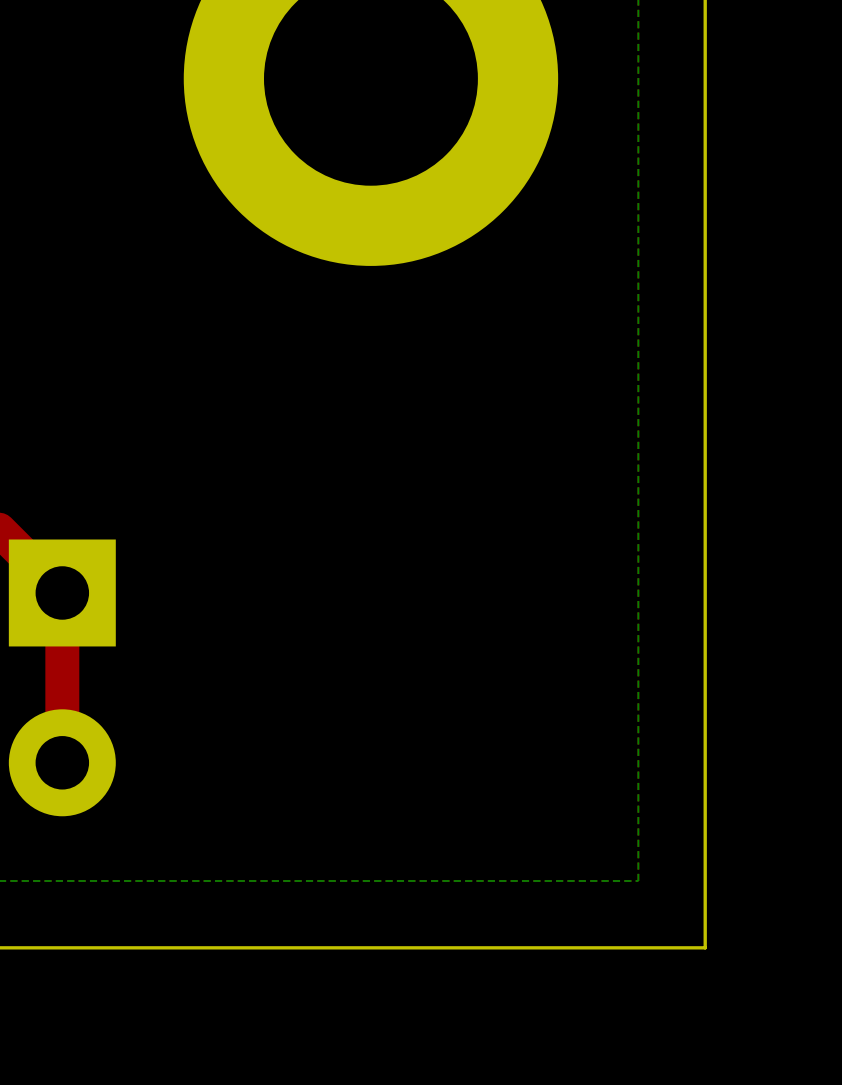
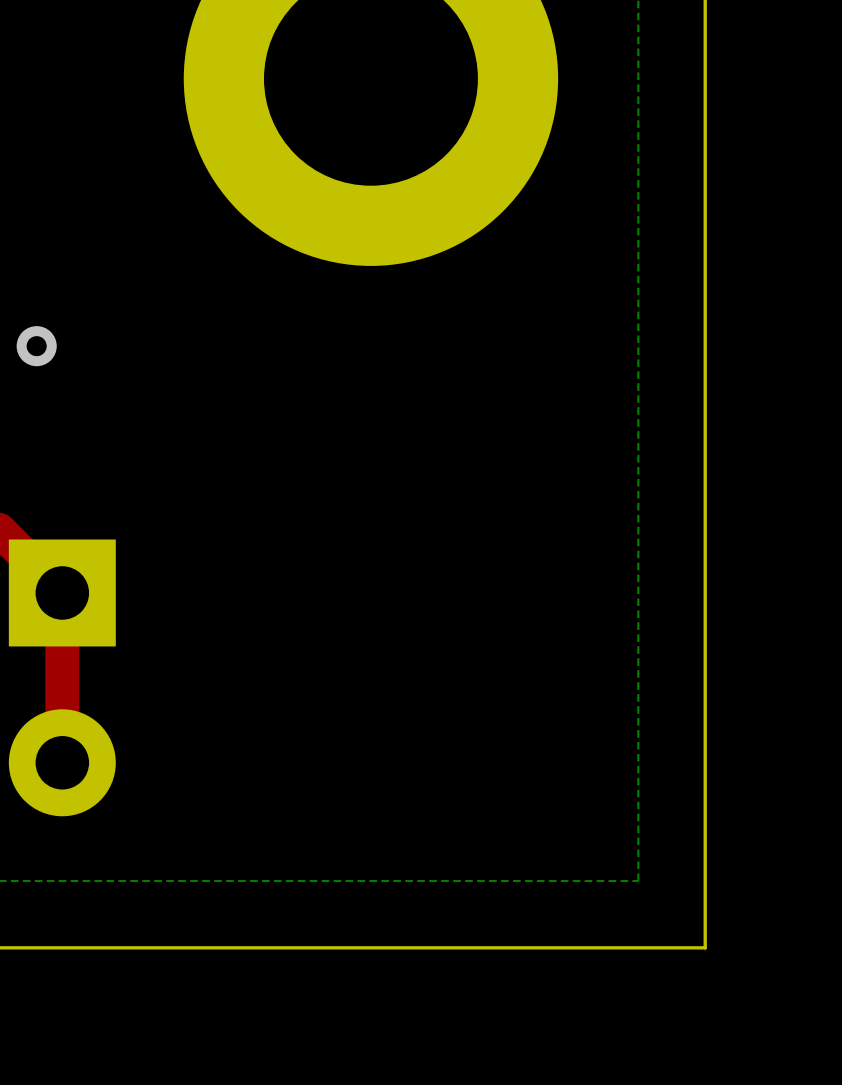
via: none -> (36, 346)

